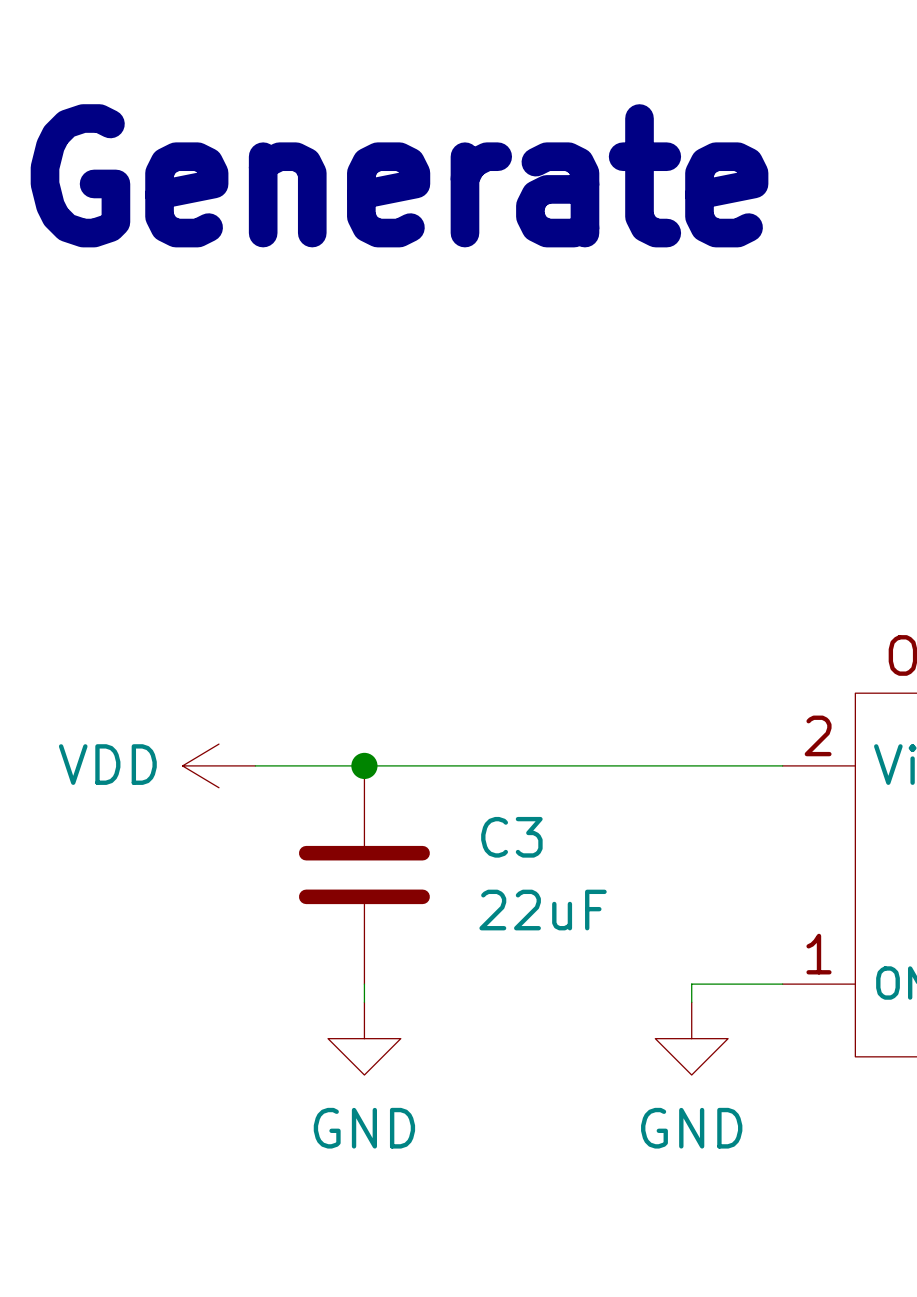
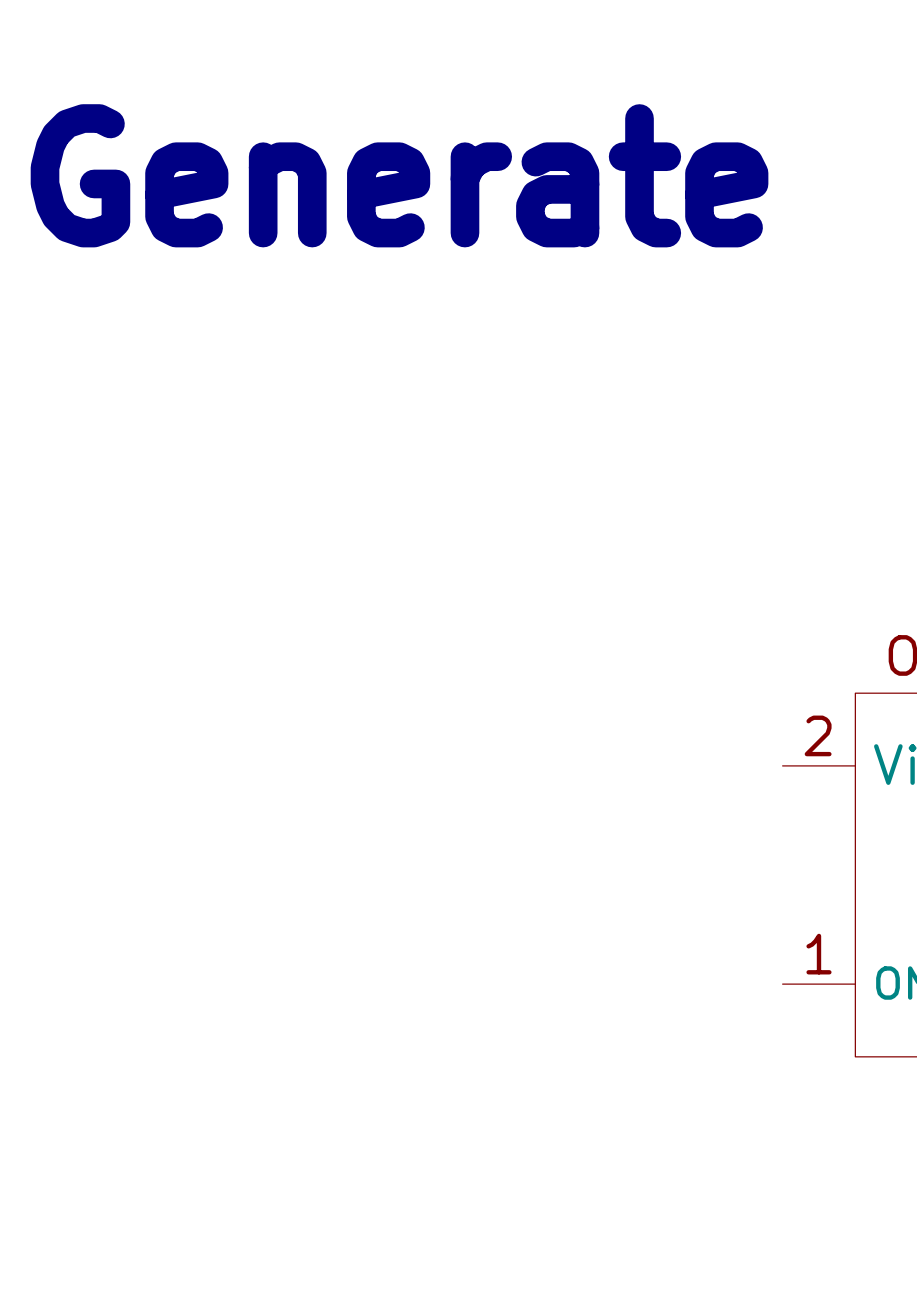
power symbol: VDD (218, 765) -> none
wire: (255, 765) (782, 765) -> none
junction: (364, 765) -> none
C3: 22uF (364, 875) -> none
wire: (364, 984) (364, 1002) -> none
wire: (782, 984) (691, 984) (691, 1002) -> none
power symbol: GND (364, 1038) -> none
power symbol: GND (691, 1038) -> none

